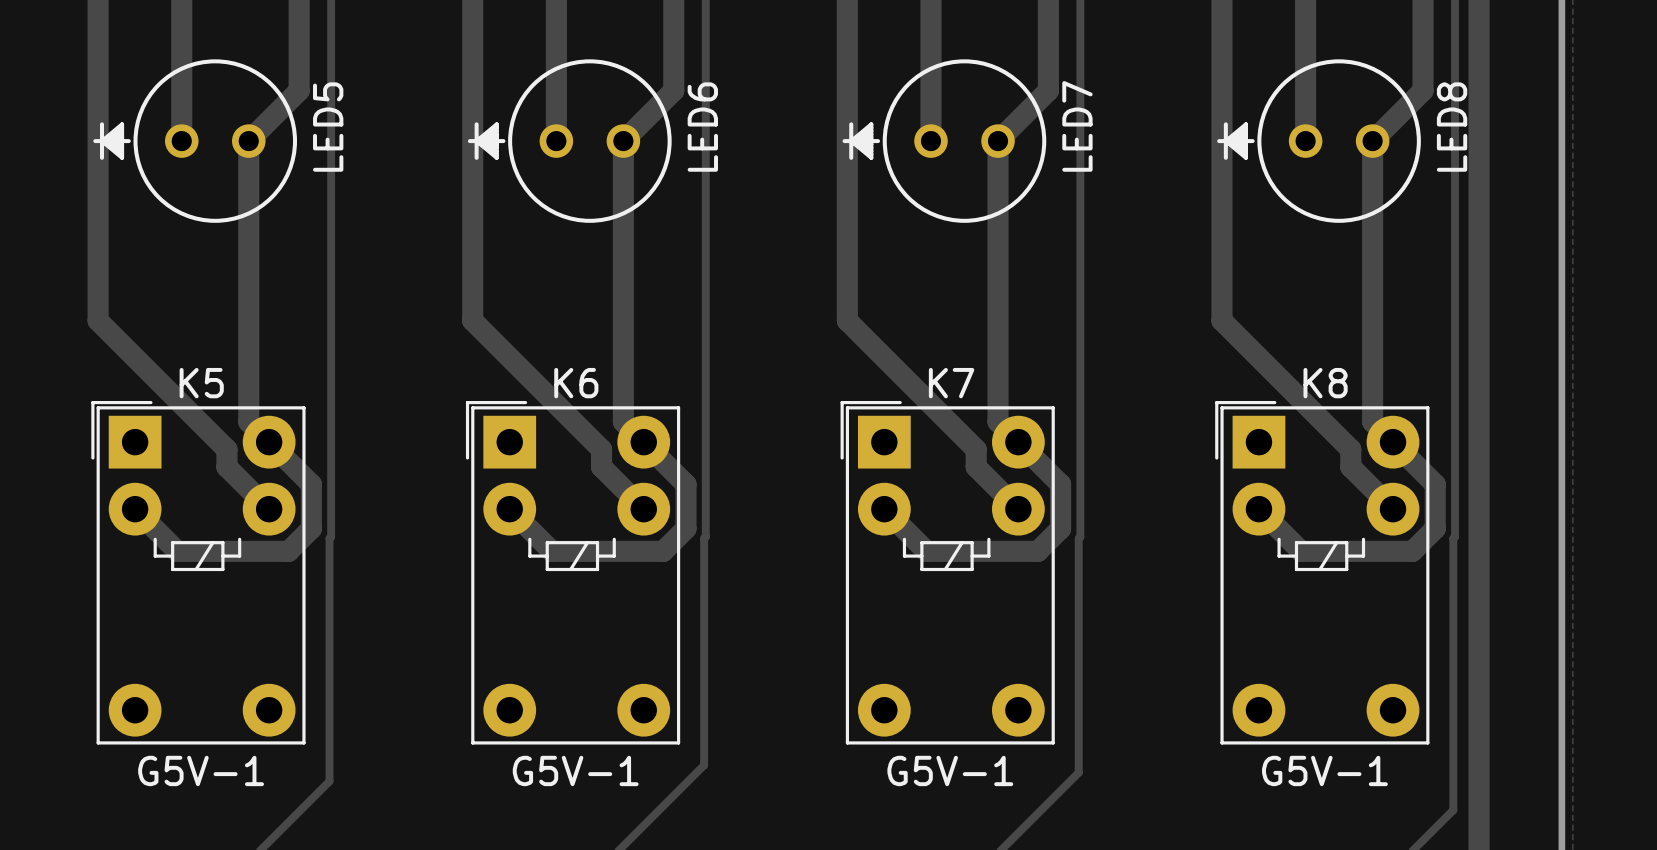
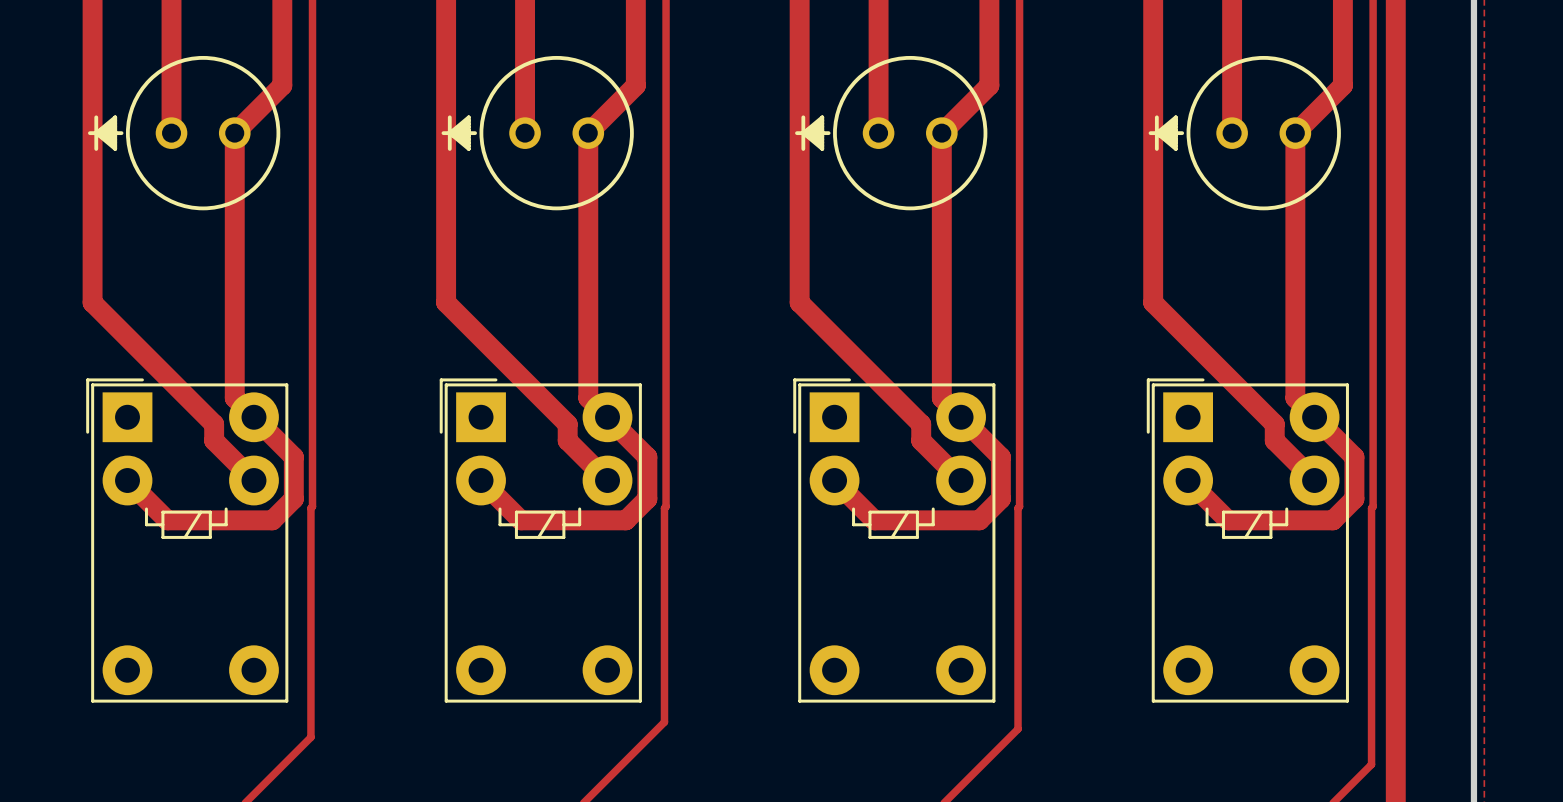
LED7 name: LED7 (1077, 126) -> none
LED5 name: LED5 (328, 127) -> none
LED6 name: LED6 (702, 127) -> none
LED8 name: LED8 (1452, 127) -> none
K5 name: K5 (201, 383) -> none
K6 name: K6 (576, 383) -> none
K7 name: K7 (951, 383) -> none
K8 name: K8 (1325, 383) -> none
K5 value: G5V-1 (201, 770) -> none
K6 value: G5V-1 (575, 770) -> none
K7 value: G5V-1 (950, 770) -> none
K8 value: G5V-1 (1324, 770) -> none

